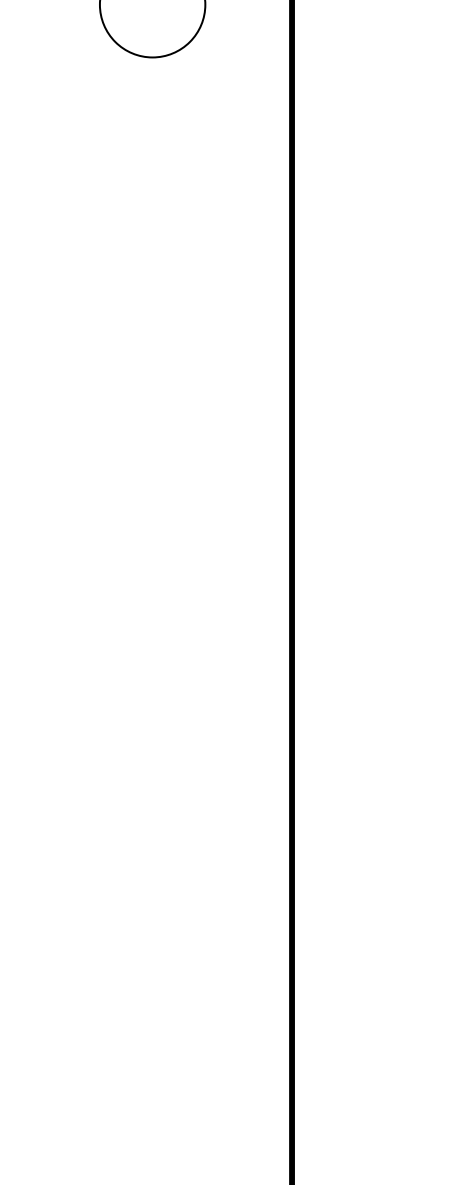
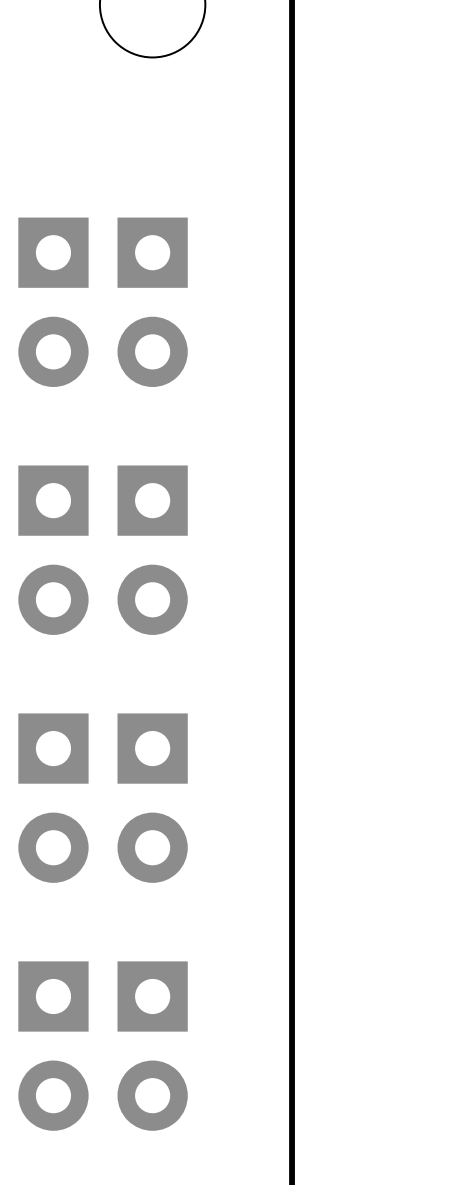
part: none -> (53, 302)
part: none -> (152, 302)
part: none -> (53, 550)
part: none -> (152, 550)
part: none -> (53, 798)
part: none -> (152, 798)
part: none -> (53, 1046)
part: none -> (152, 1046)

